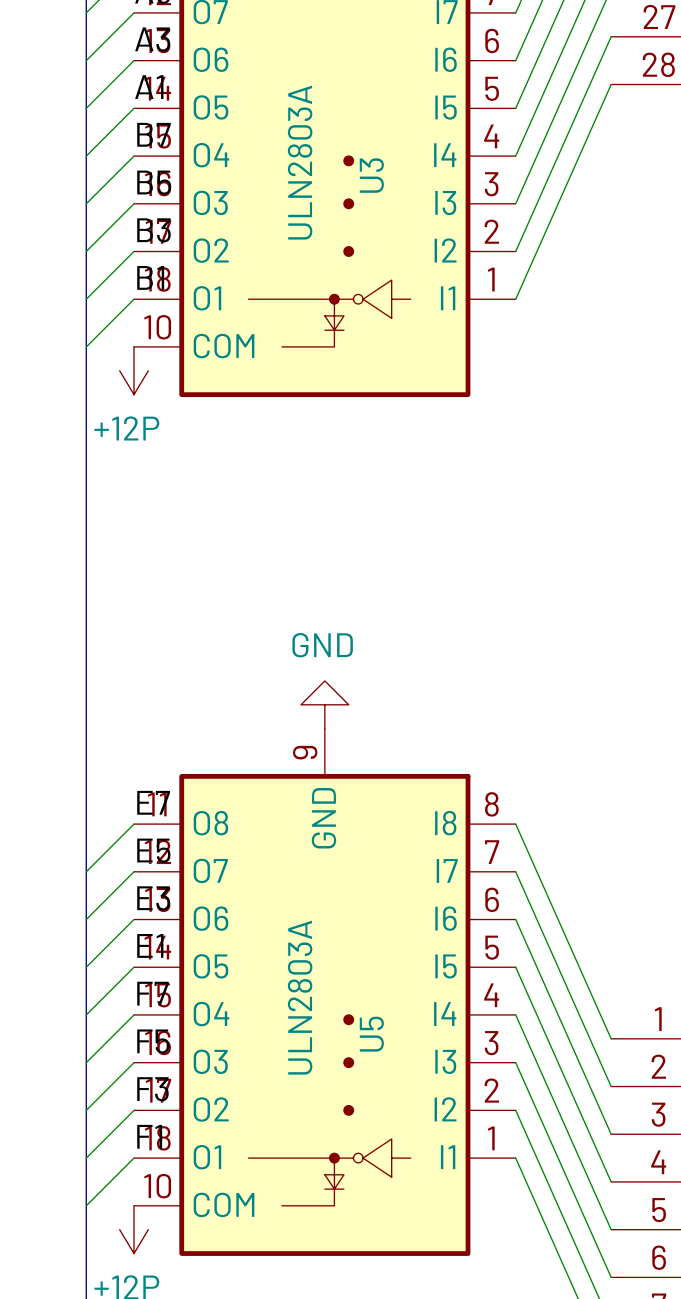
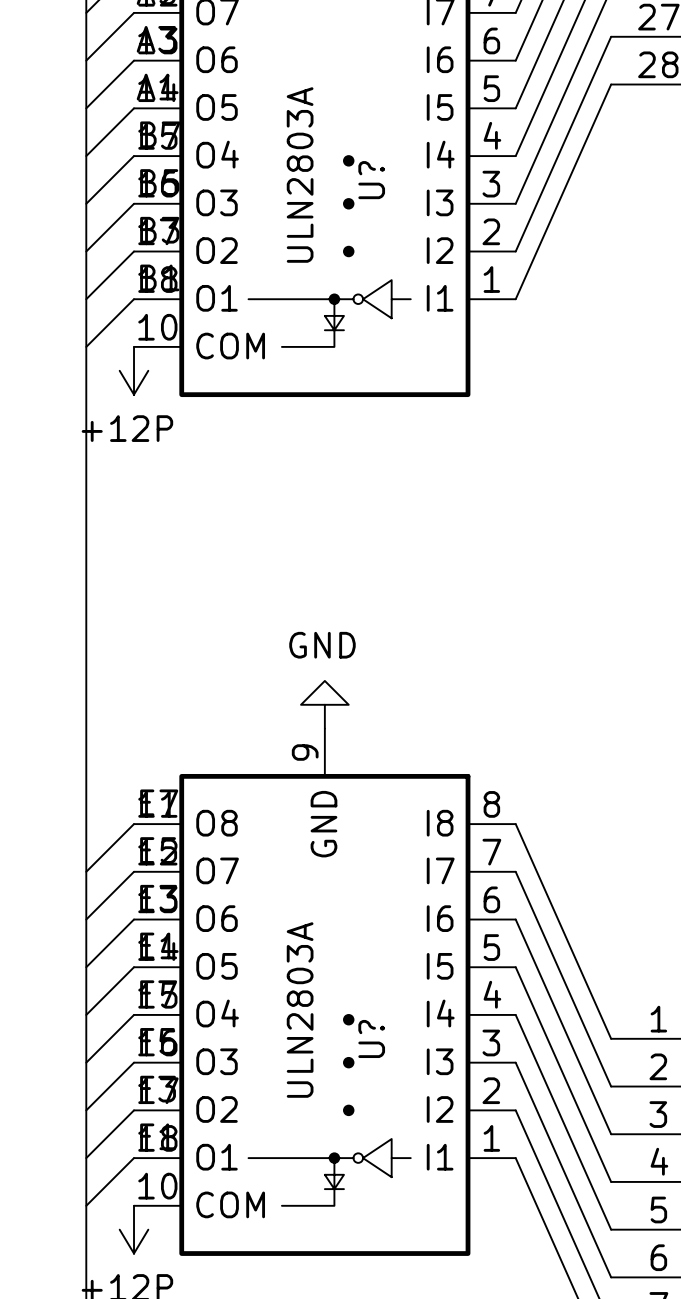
U3 name: U3 (371, 175) -> U? (371, 180)
U5 name: U5 (371, 1034) -> U? (371, 1038)

